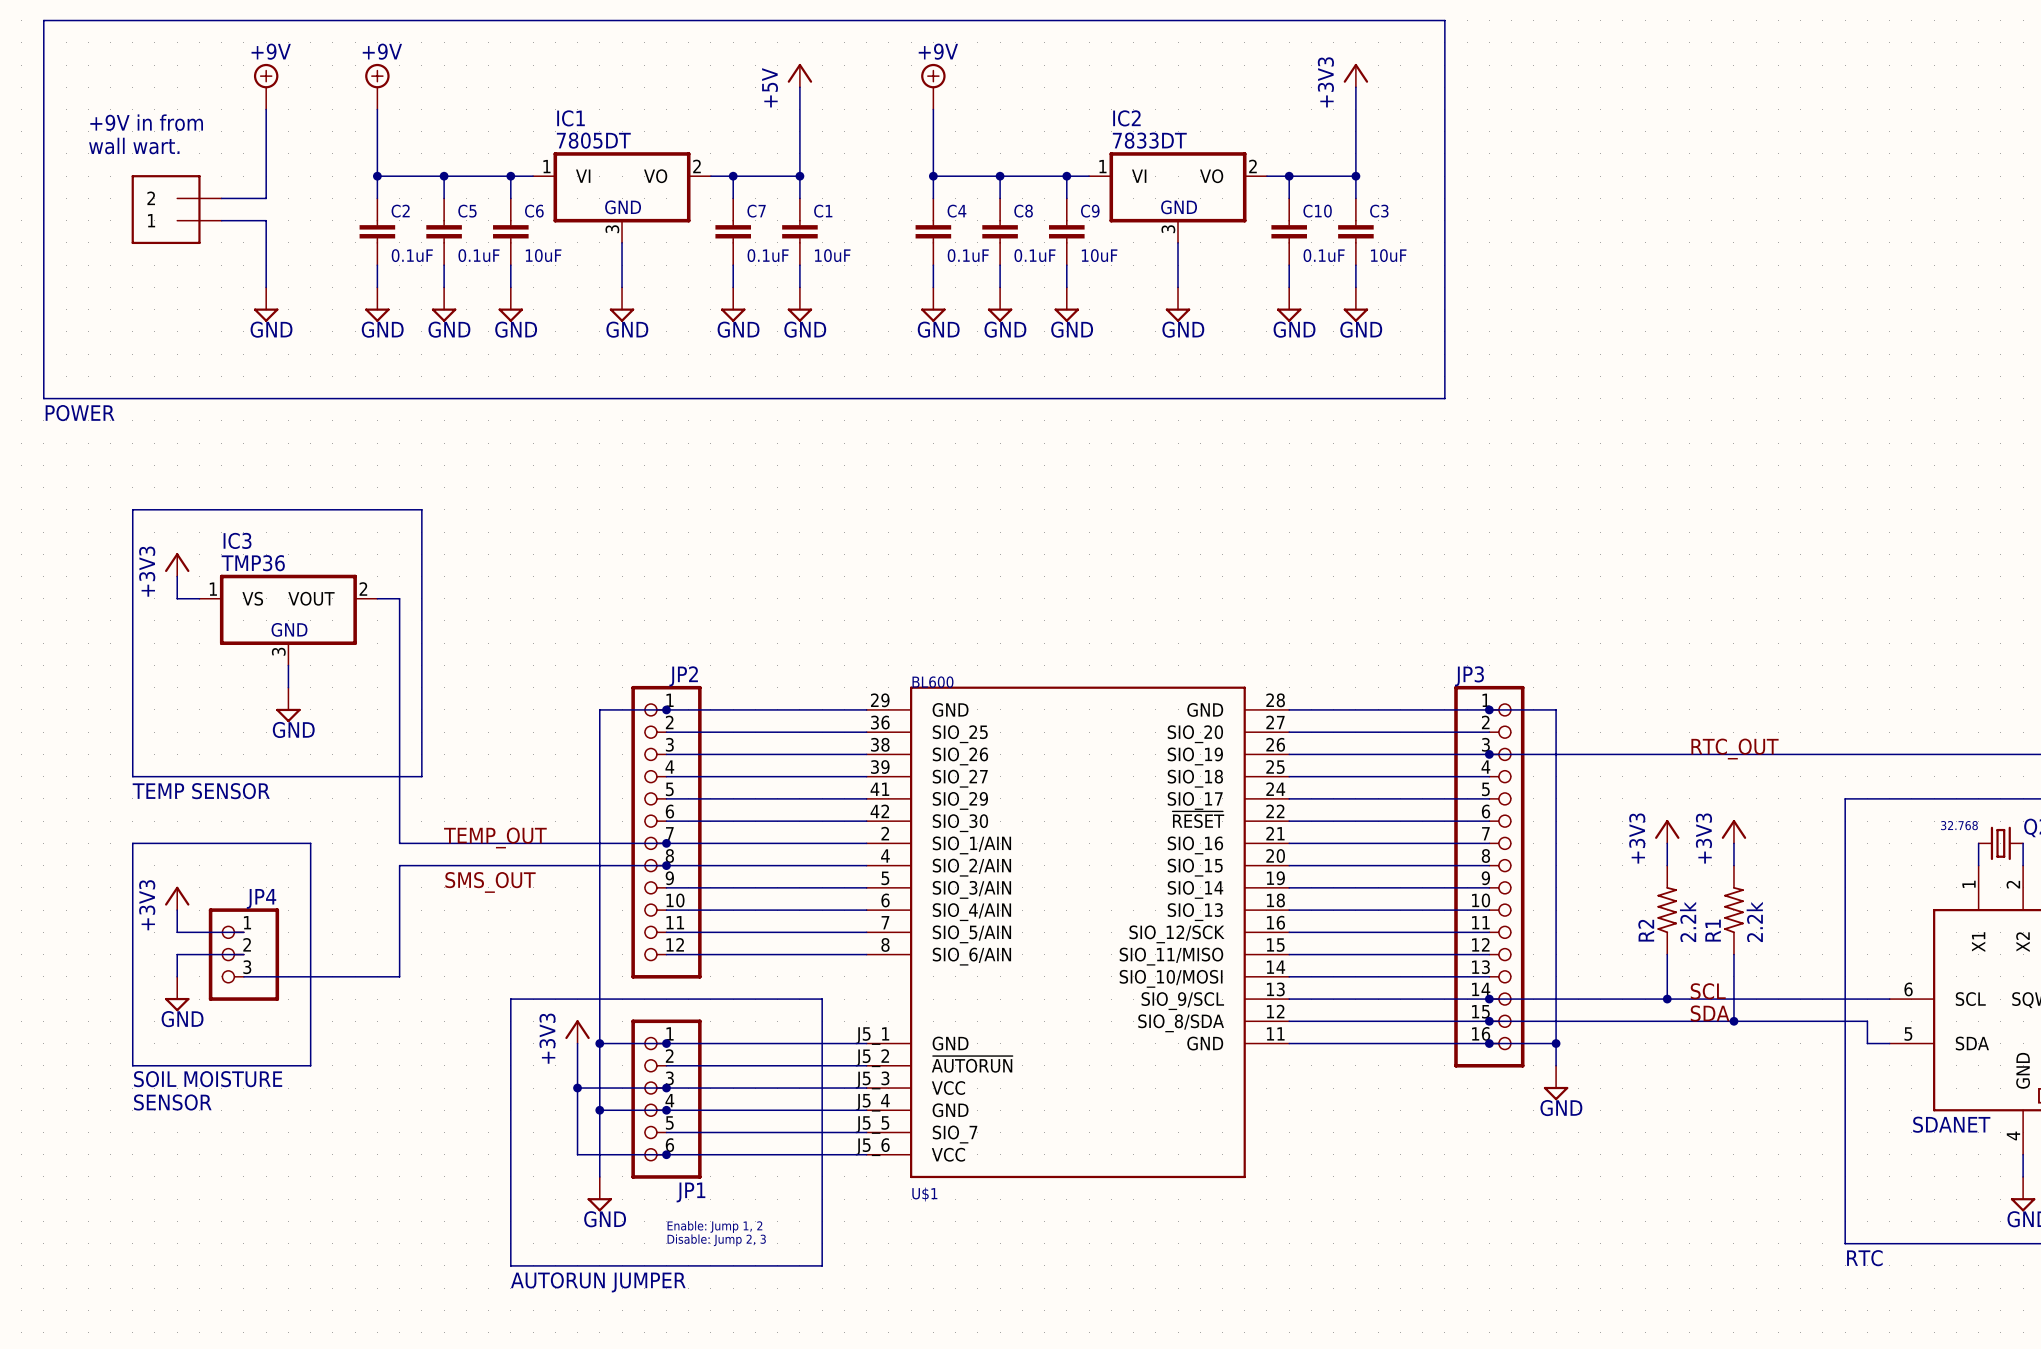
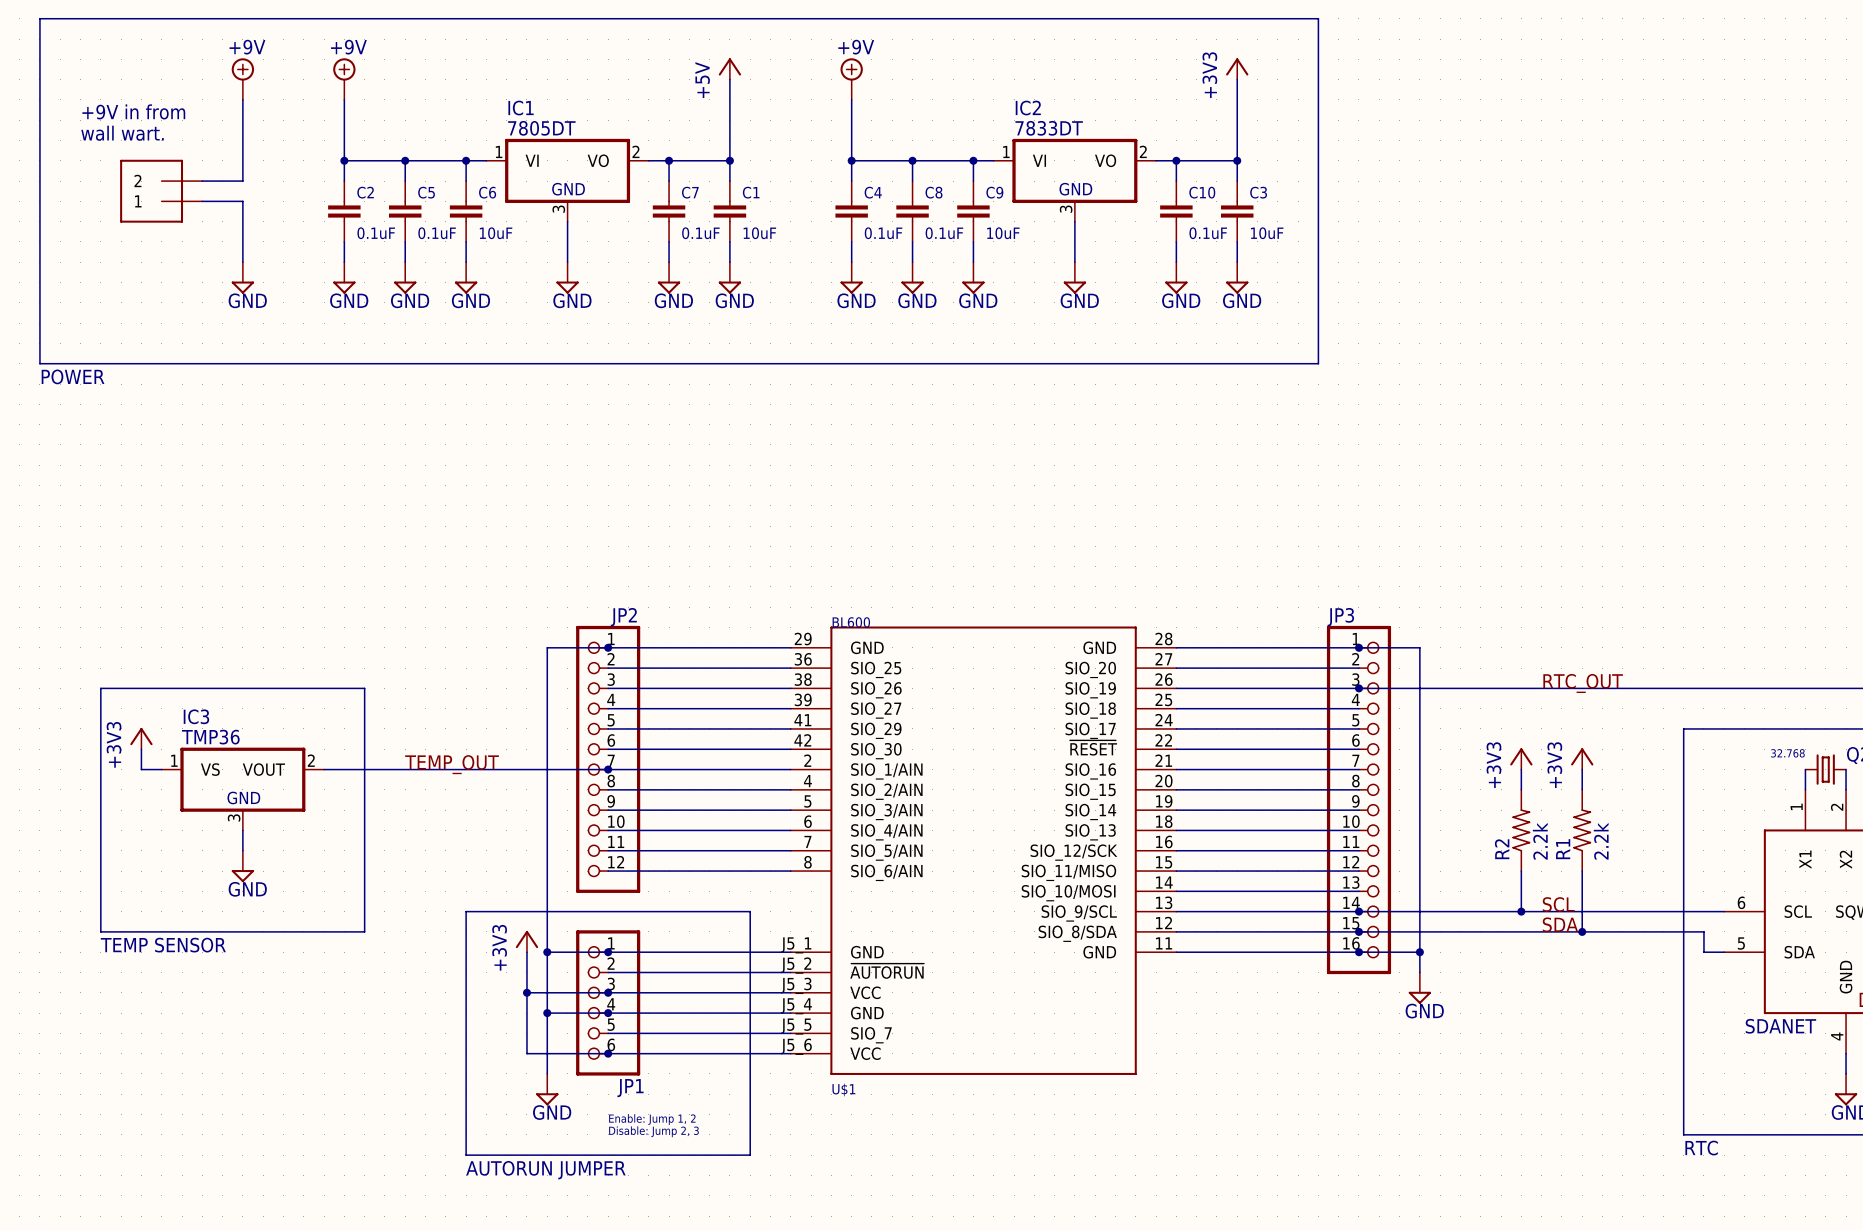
line: (132, 509) (421, 509) (421, 776) (132, 776) (132, 509) -> none
power symbol: +3V3 (177, 564) -> none
wire: (177, 576) (177, 598) (199, 598) -> none
wire: (377, 598) (399, 598) (399, 843) -> (324, 769) (364, 769)
IC3 position: (288, 620) -> (242, 789)
wire: (288, 665) (288, 687) -> none
power symbol: GND (288, 704) -> none
line: none -> (100, 688) (364, 688) (364, 931) (100, 931) (100, 688)
text: TEMP SENSOR (201, 791) -> none
wire: none -> (141, 749) (141, 769) (161, 769)
line: (132, 843) (132, 1065) (310, 1065) (310, 843) (132, 843) -> none
wire: (666, 865) (399, 865) (399, 976) (243, 976) -> none
junction: (666, 865) -> none
label: SMS_OUT (490, 882) -> none
power symbol position: +3V3 (177, 898) -> +3V3 (141, 738)
wire: (177, 910) (177, 932) (243, 932) -> none
wire: none -> (242, 830) (242, 850)
wire: (243, 954) (177, 954) (177, 976) -> none
JP4: (243, 954) -> none
power symbol position: GND (177, 994) -> GND (242, 866)
text: none -> TEMP SENSOR (163, 945)
text: SOIL MOISTURE (208, 1079) -> none
text: SENSOR (172, 1102) -> none

